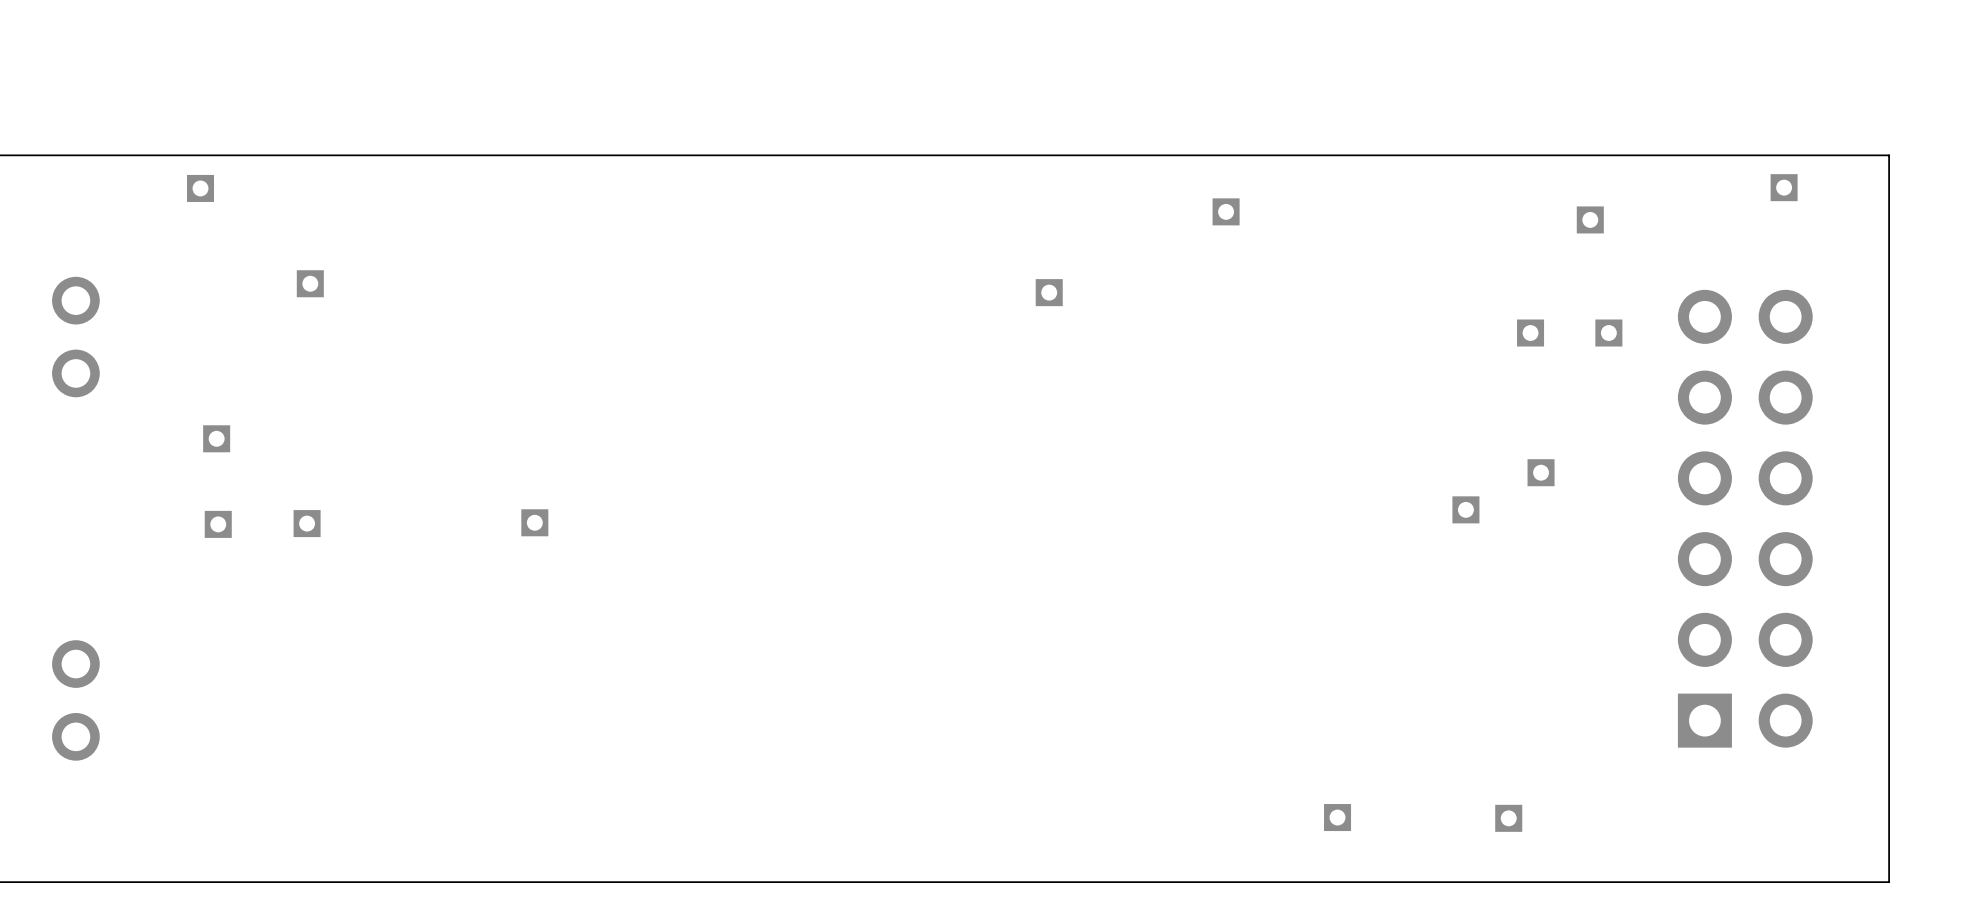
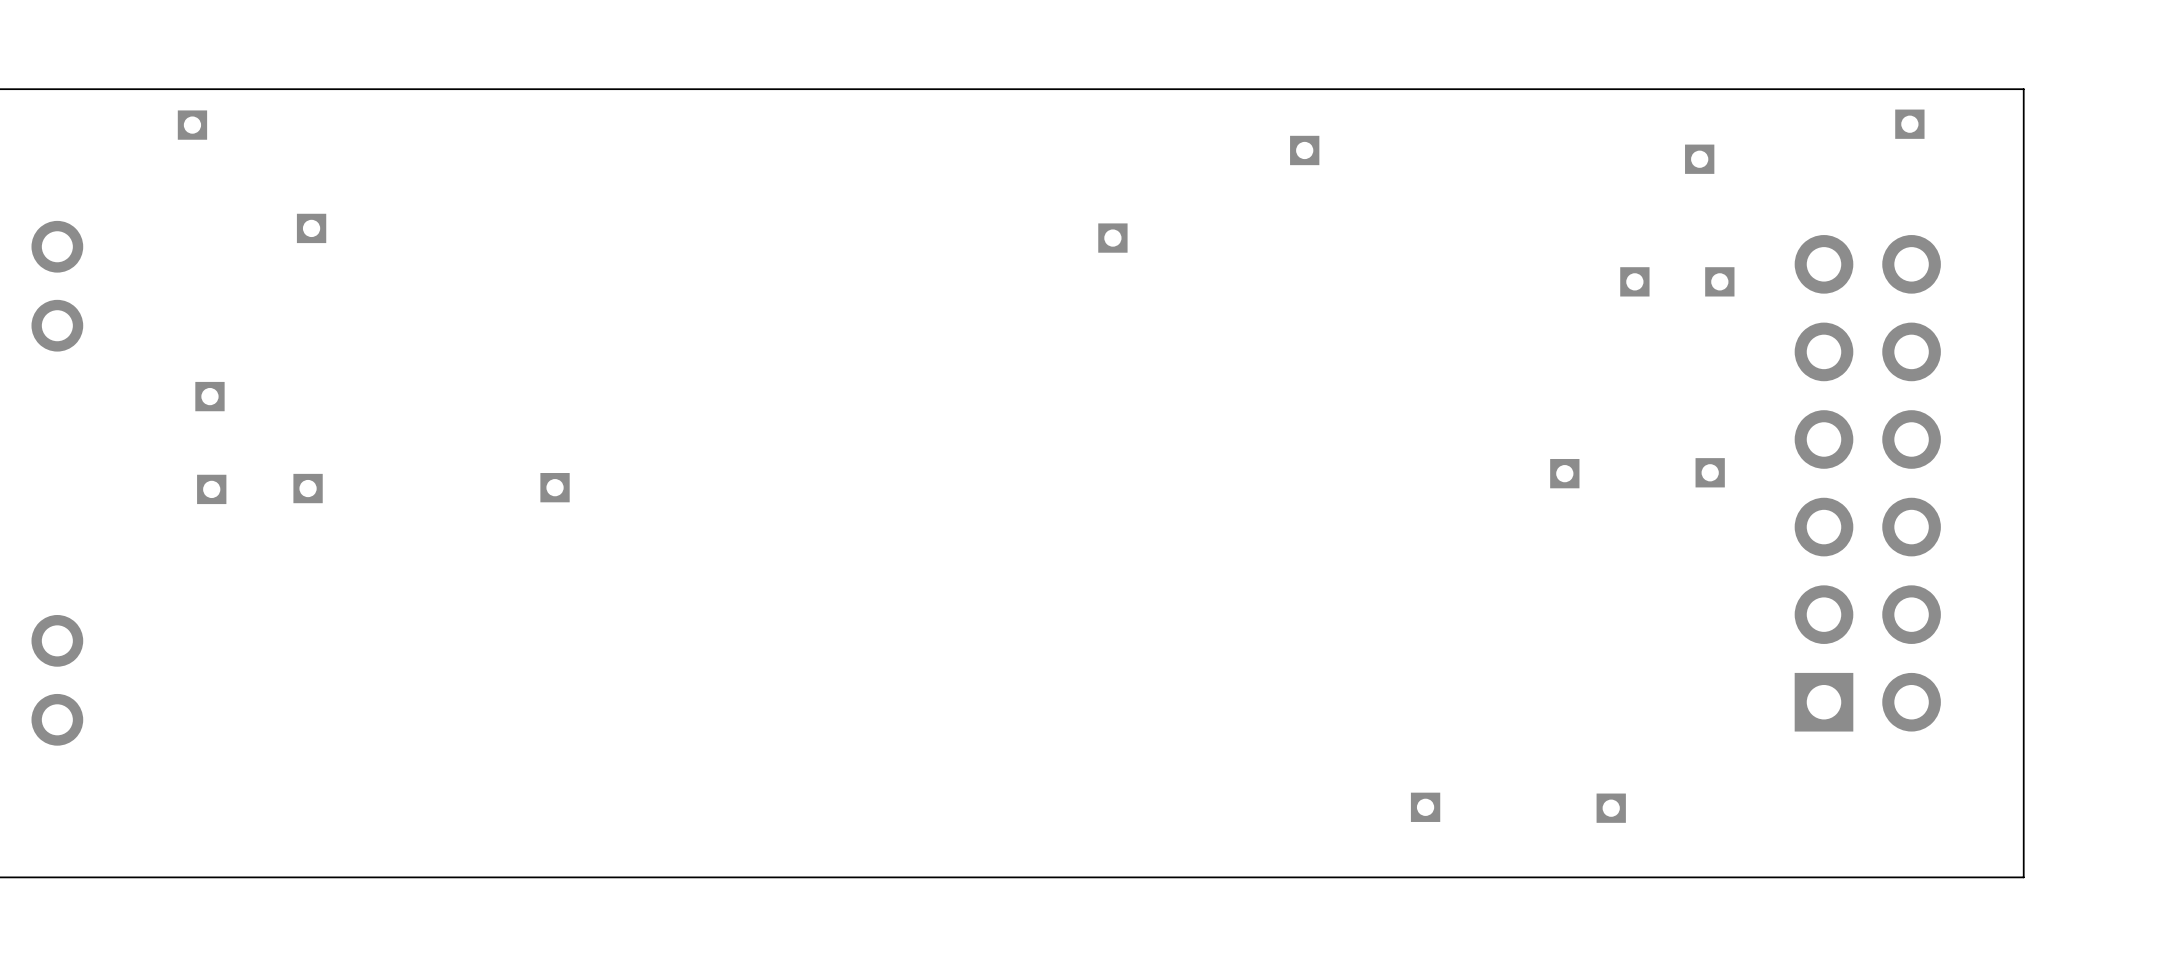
part position: (1541, 472) -> (1710, 472)

